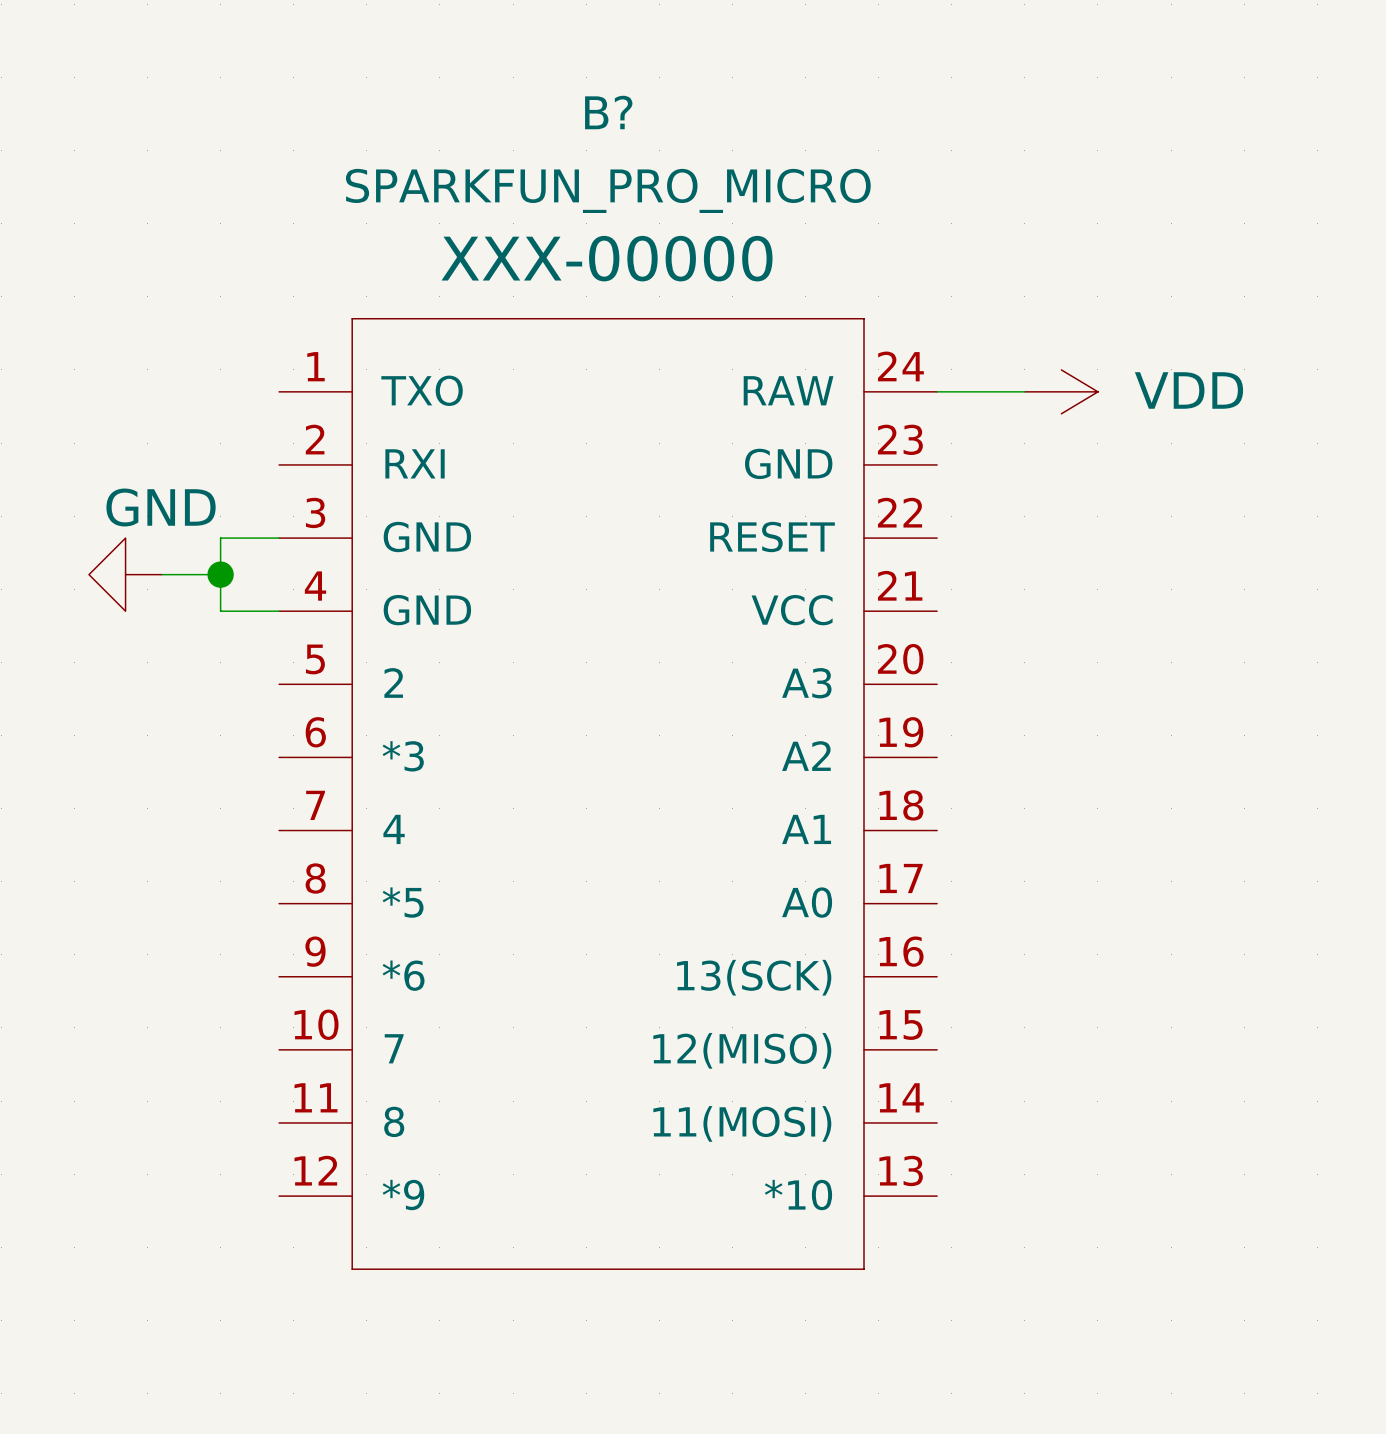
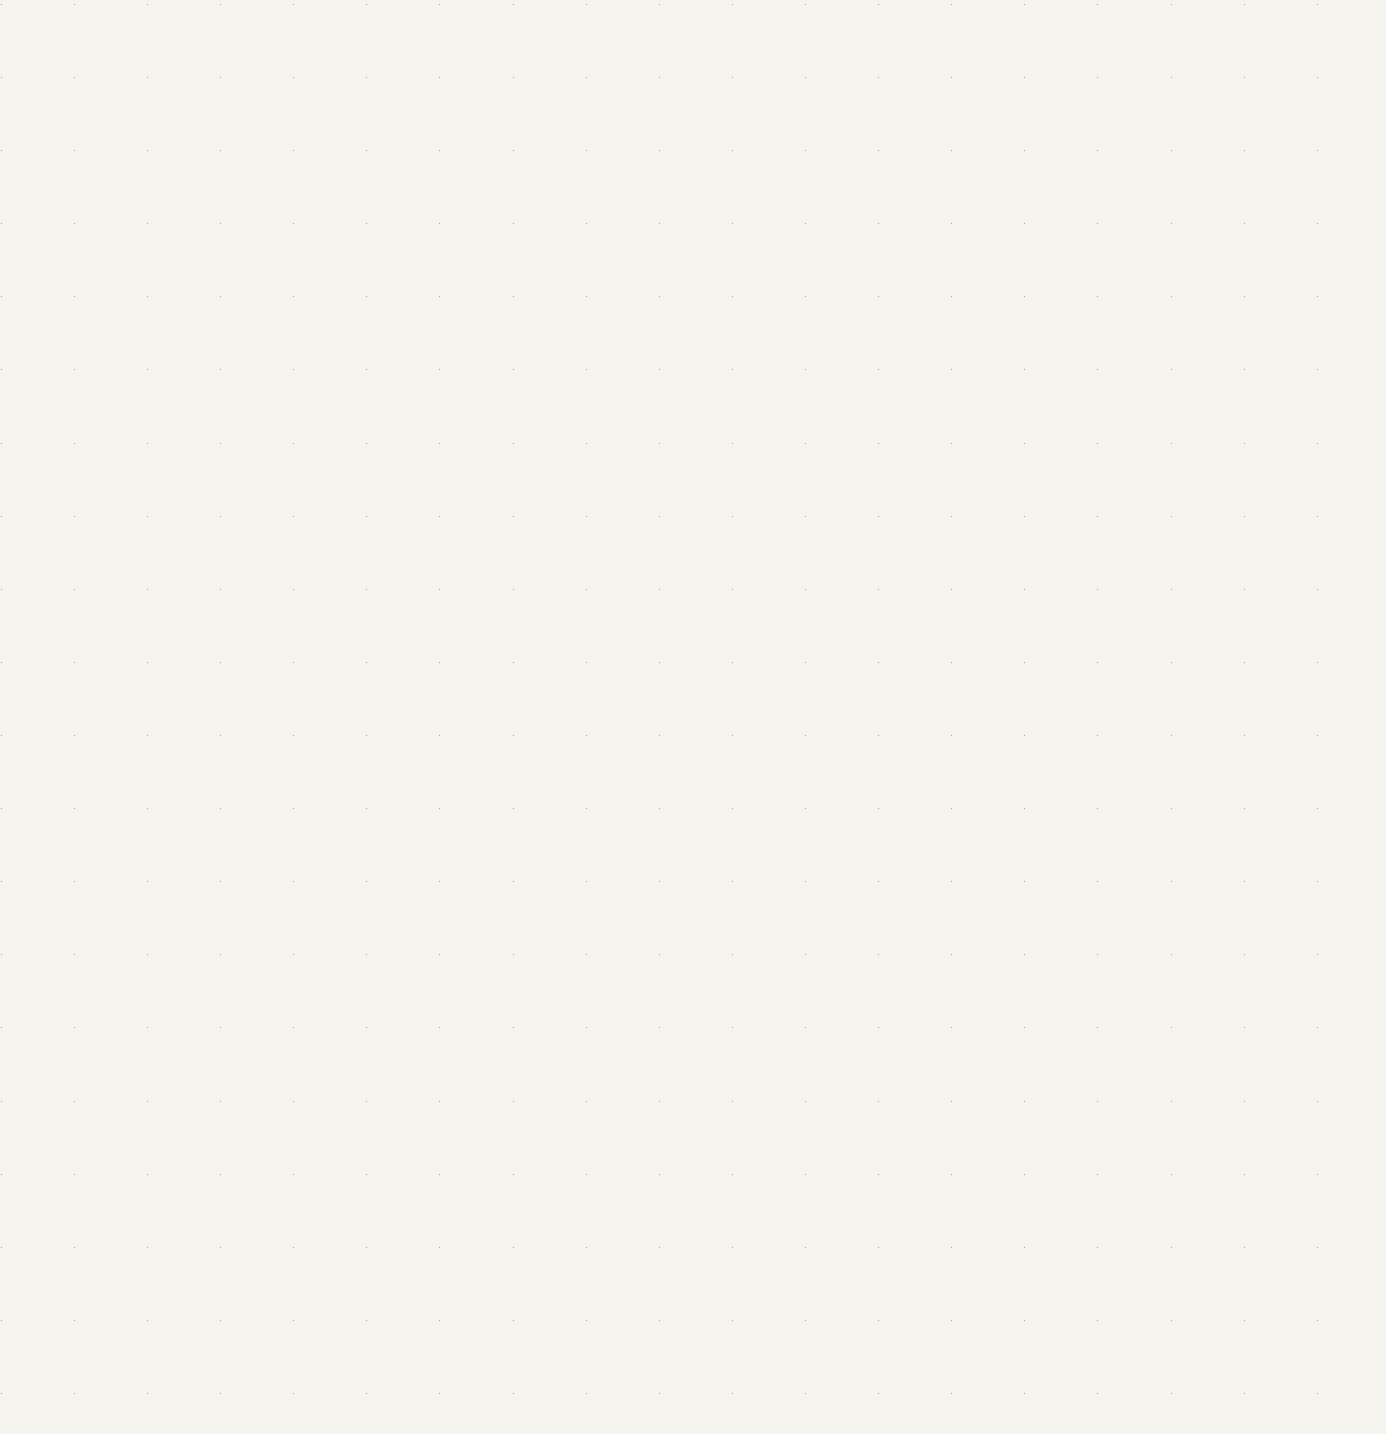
wire: (937, 391) (1024, 391) -> none
power symbol: VDD (1061, 391) -> none
wire: (279, 538) (220, 538) (220, 611) (279, 611) -> none
power symbol: GND (125, 574) -> none
wire: (162, 574) (220, 574) -> none
junction: (220, 574) -> none
B?: SPARKFUN_PRO_MICRO (608, 793) -> none

